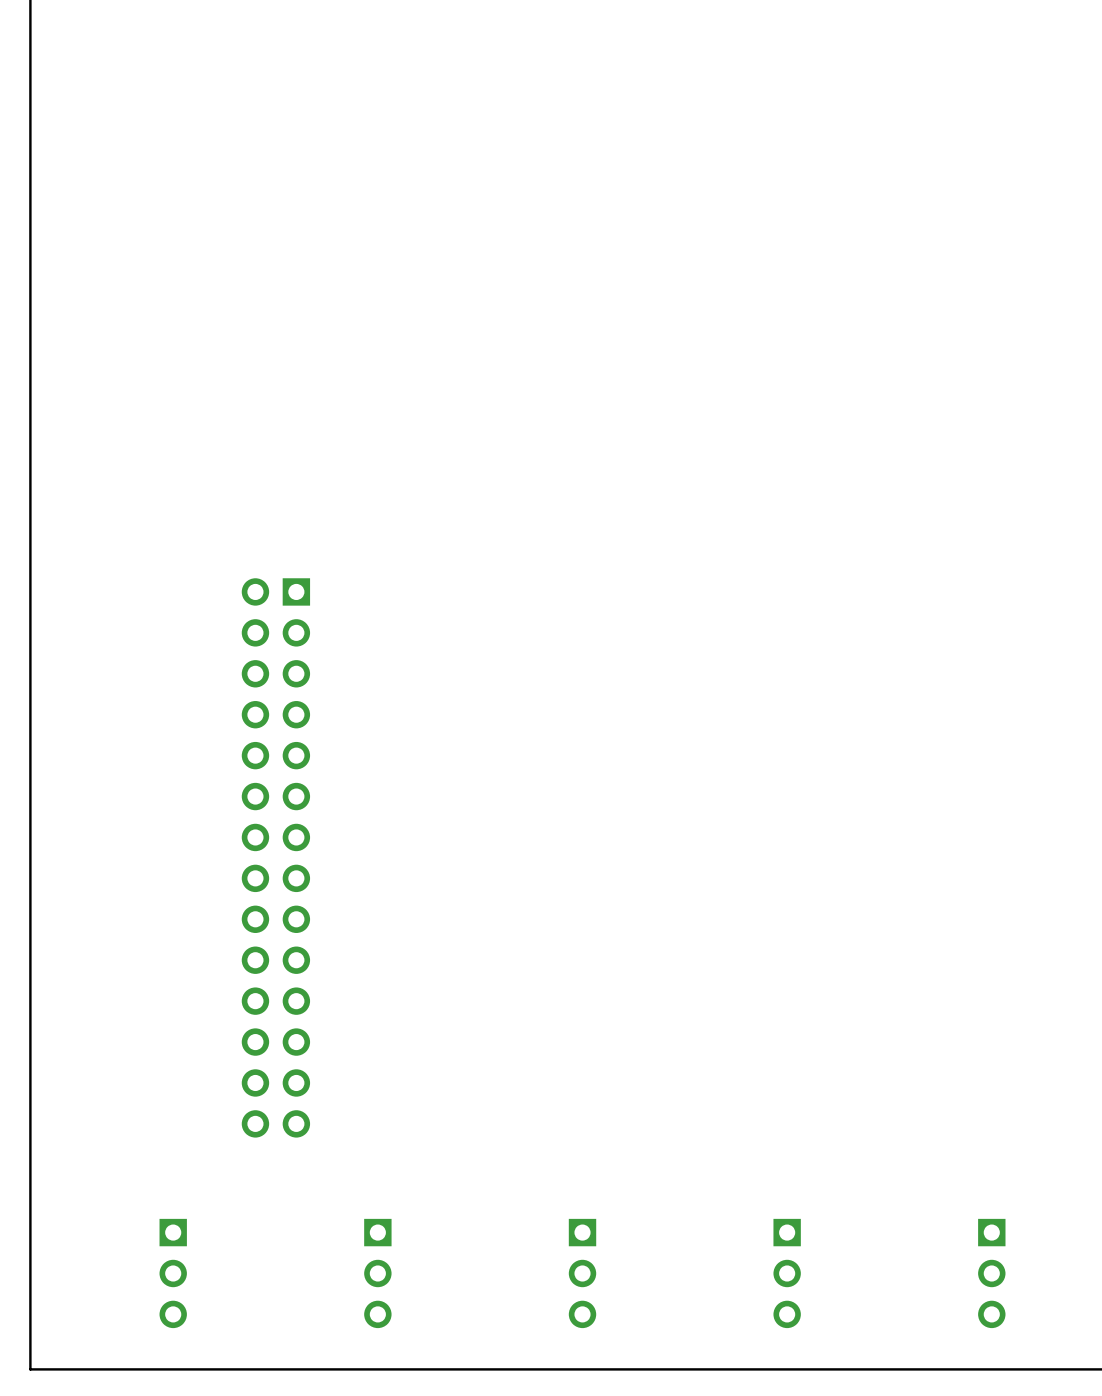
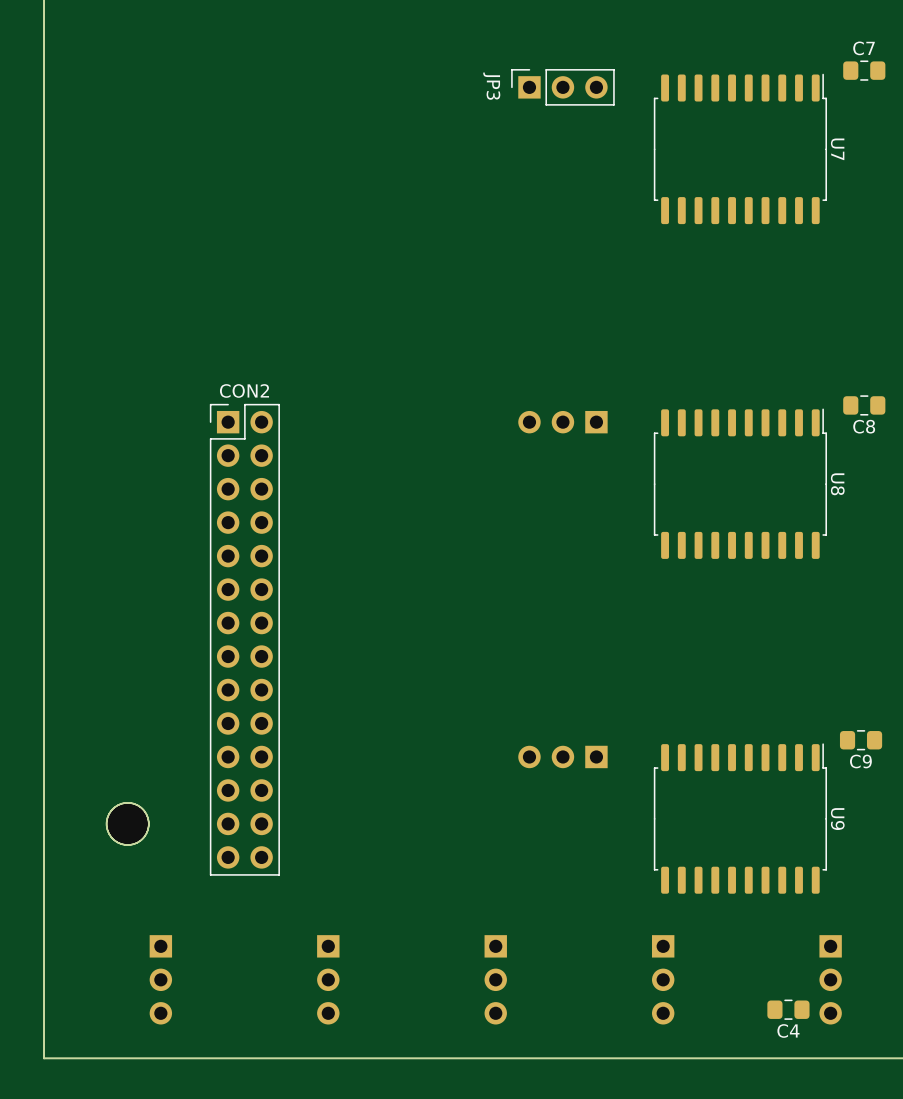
C7: none -> (864, 70)
JP3: none -> (562, 87)
U7: none -> (740, 148)
C8: none -> (864, 405)
part: none -> (562, 422)
U8: none -> (740, 483)
CON2 side: top (275, 857) -> bottom (244, 639)
C9: none -> (861, 740)
part: none -> (562, 756)
U9: none -> (740, 818)
part: none -> (127, 823)
C4: none -> (788, 1009)

